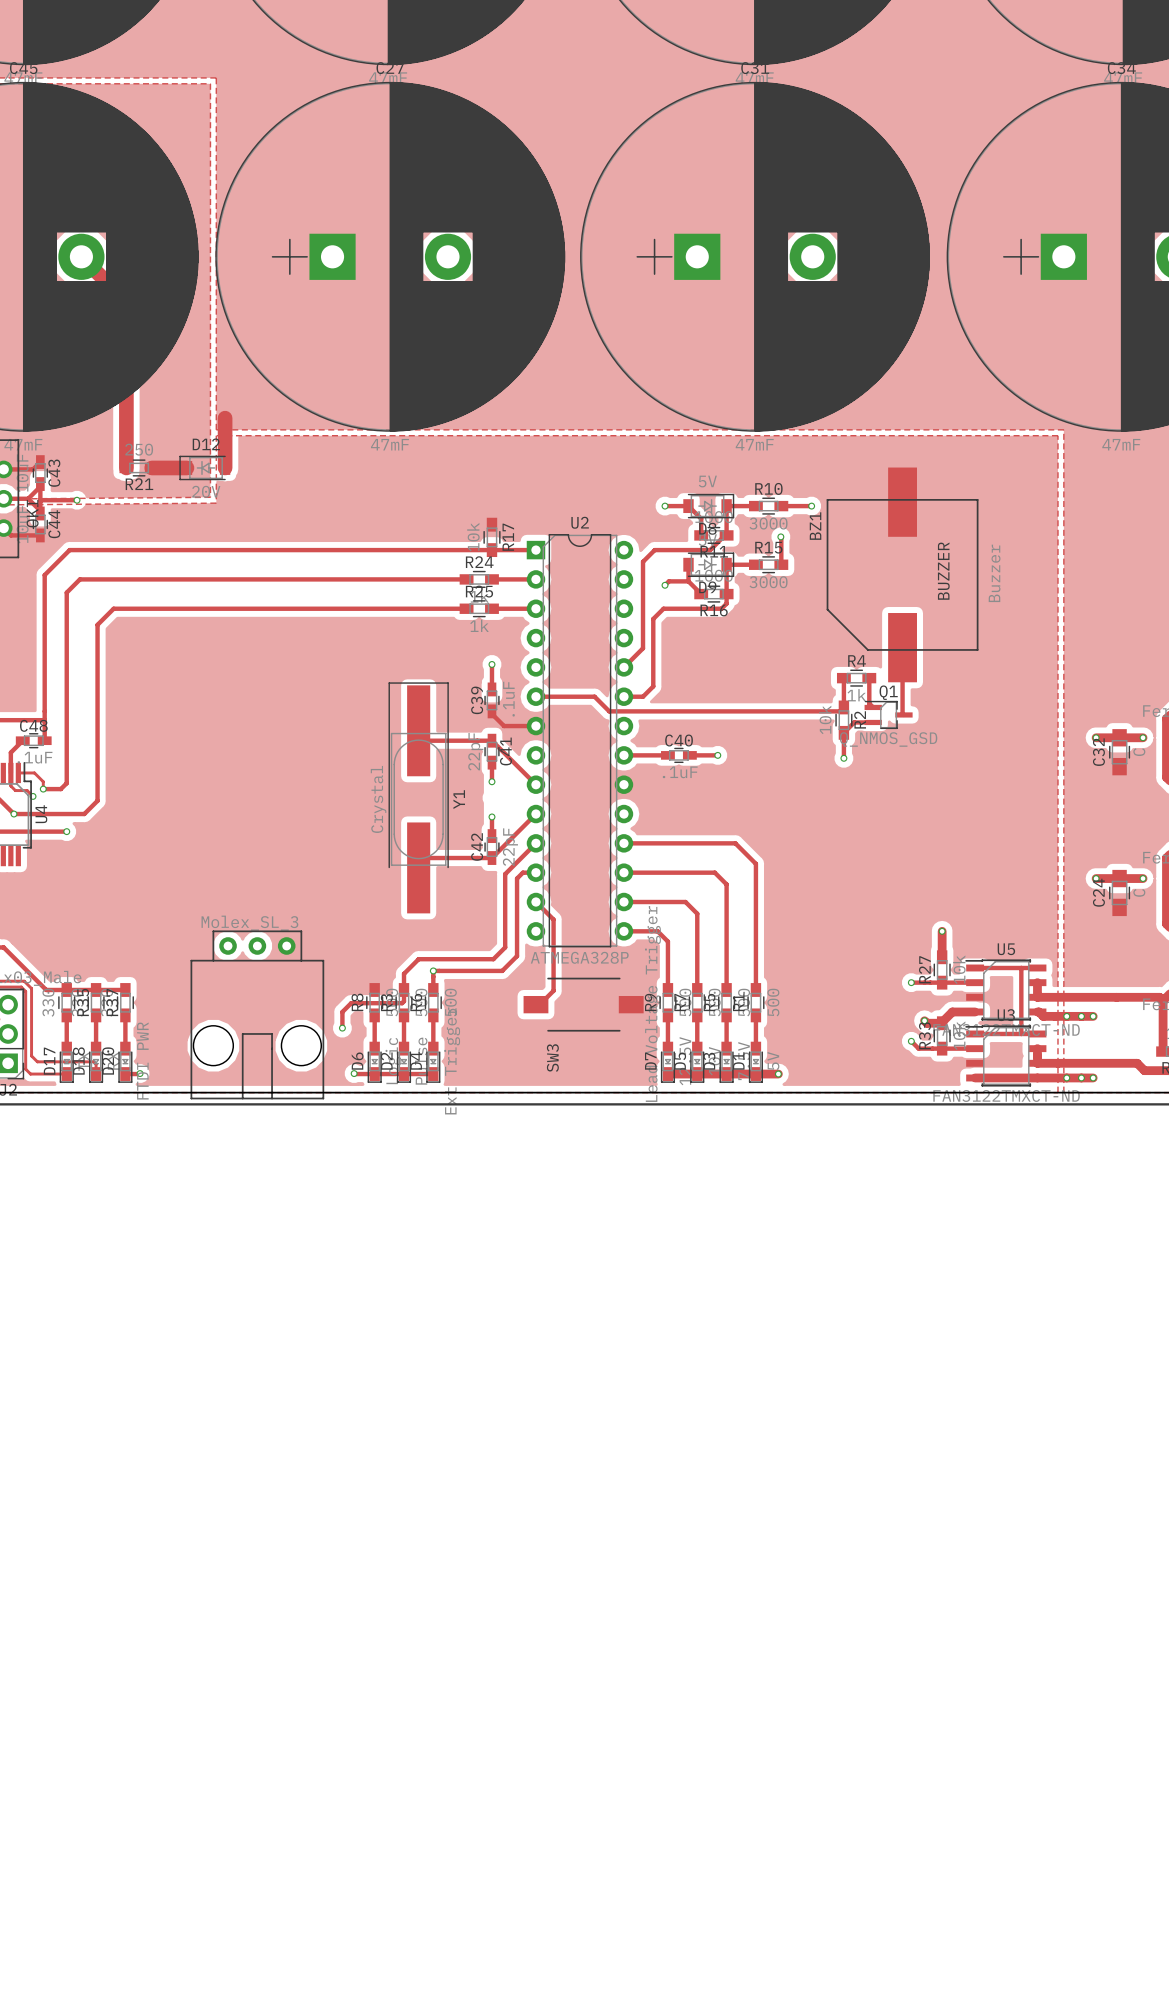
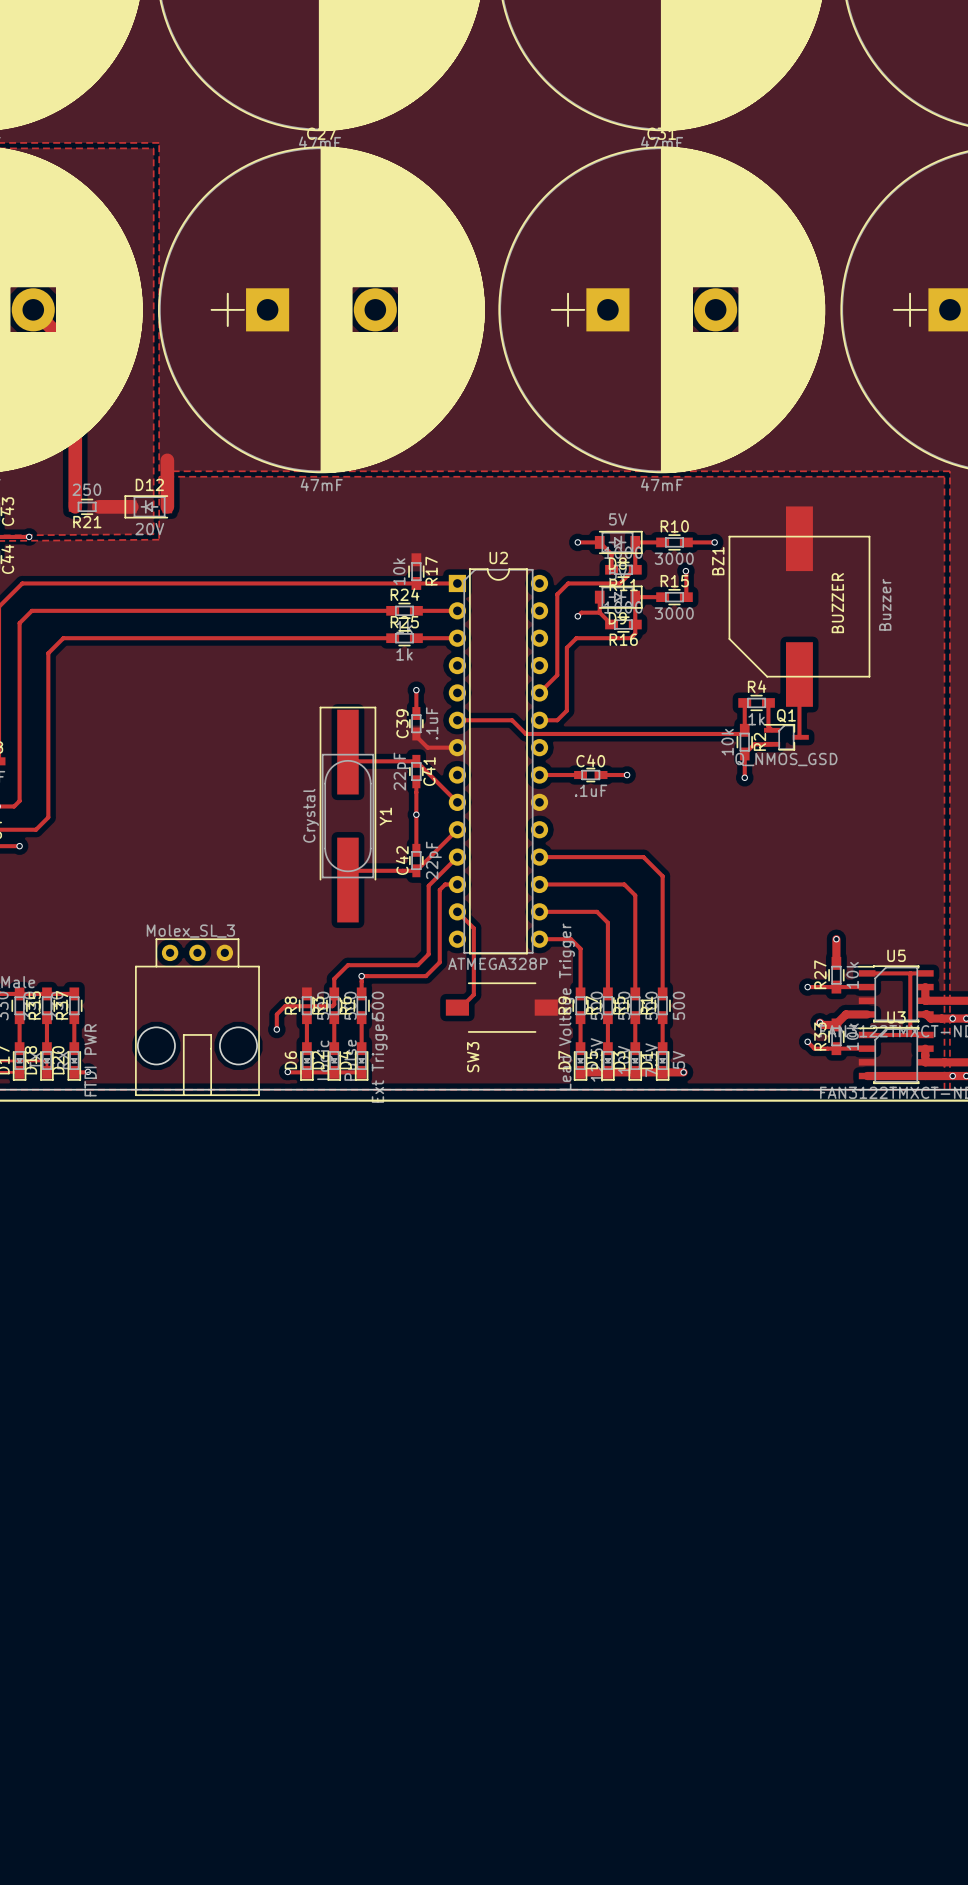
track: none -> (416, 799) (416, 832)
via: (491, 781) -> none
via: none -> (416, 814)
via: (491, 816) -> none

